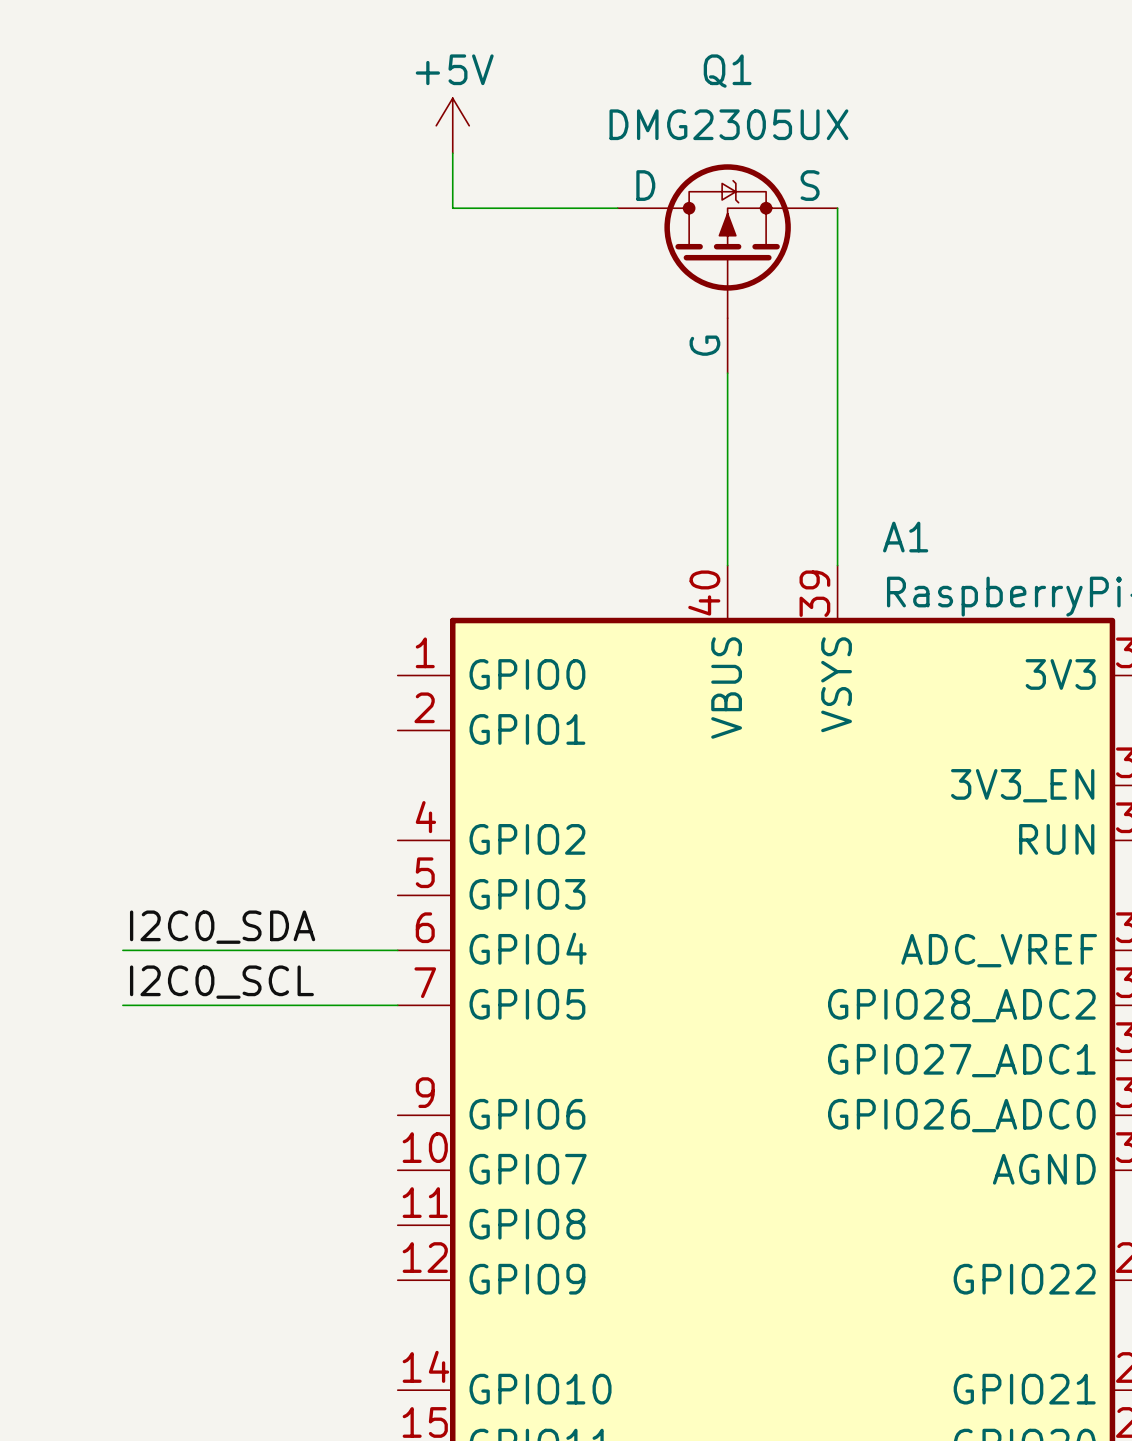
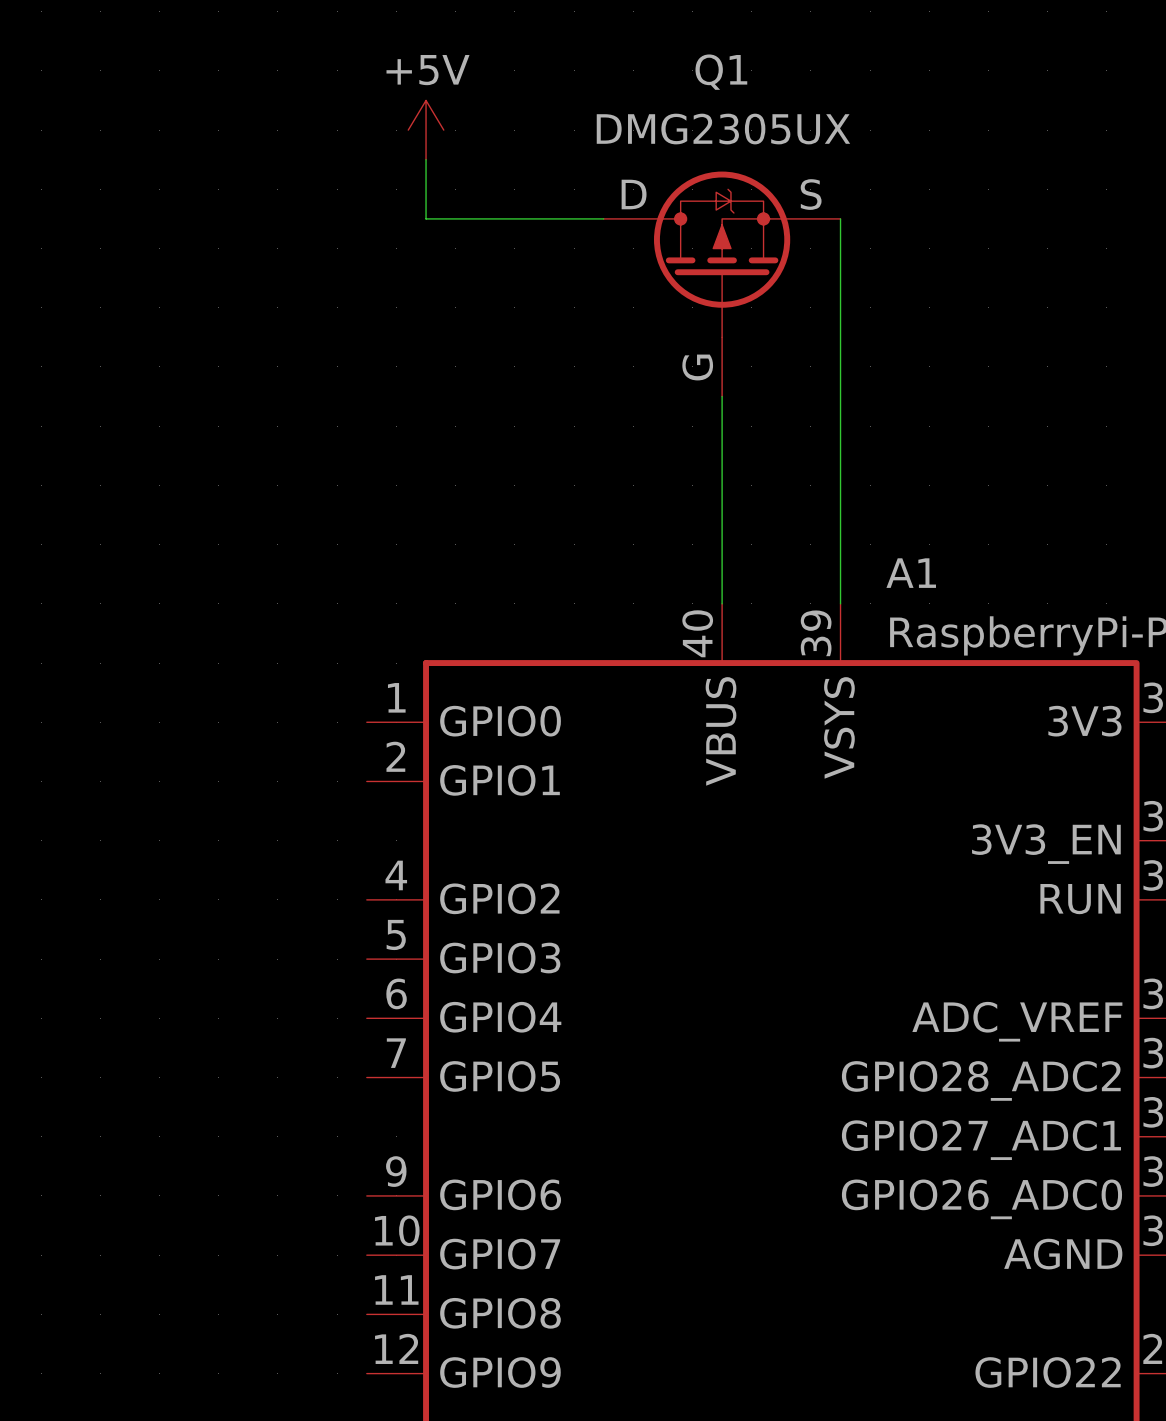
label: I2C0_SDA (222, 927) -> none
wire: (122, 950) (397, 950) -> none
label: I2C0_SCL (221, 982) -> none
wire: (122, 1005) (397, 1005) -> none

